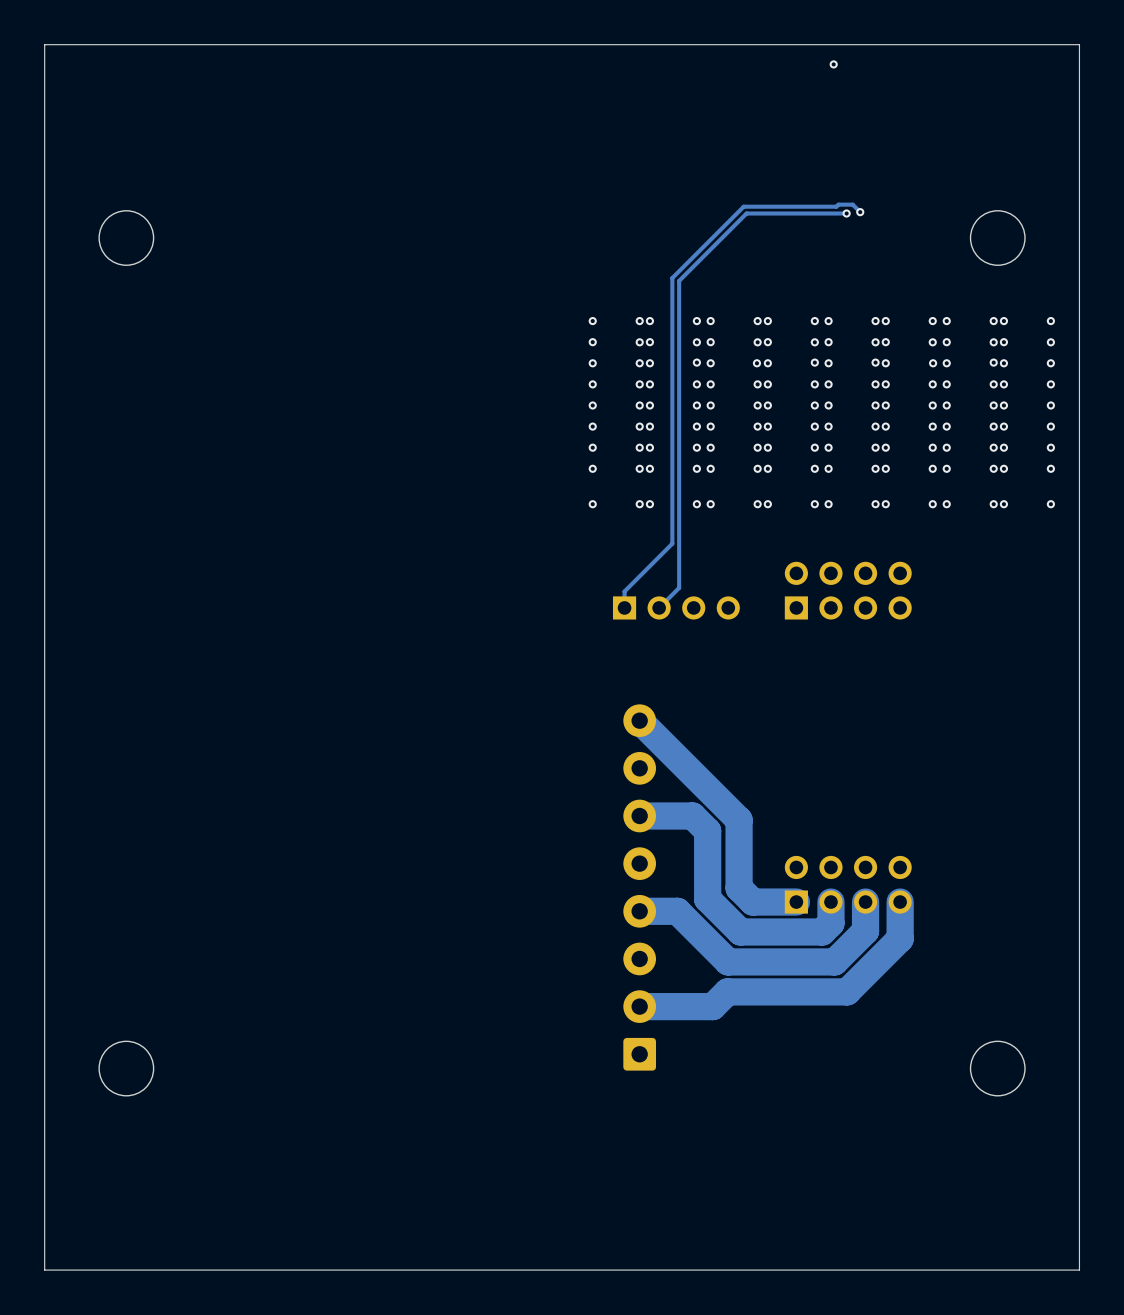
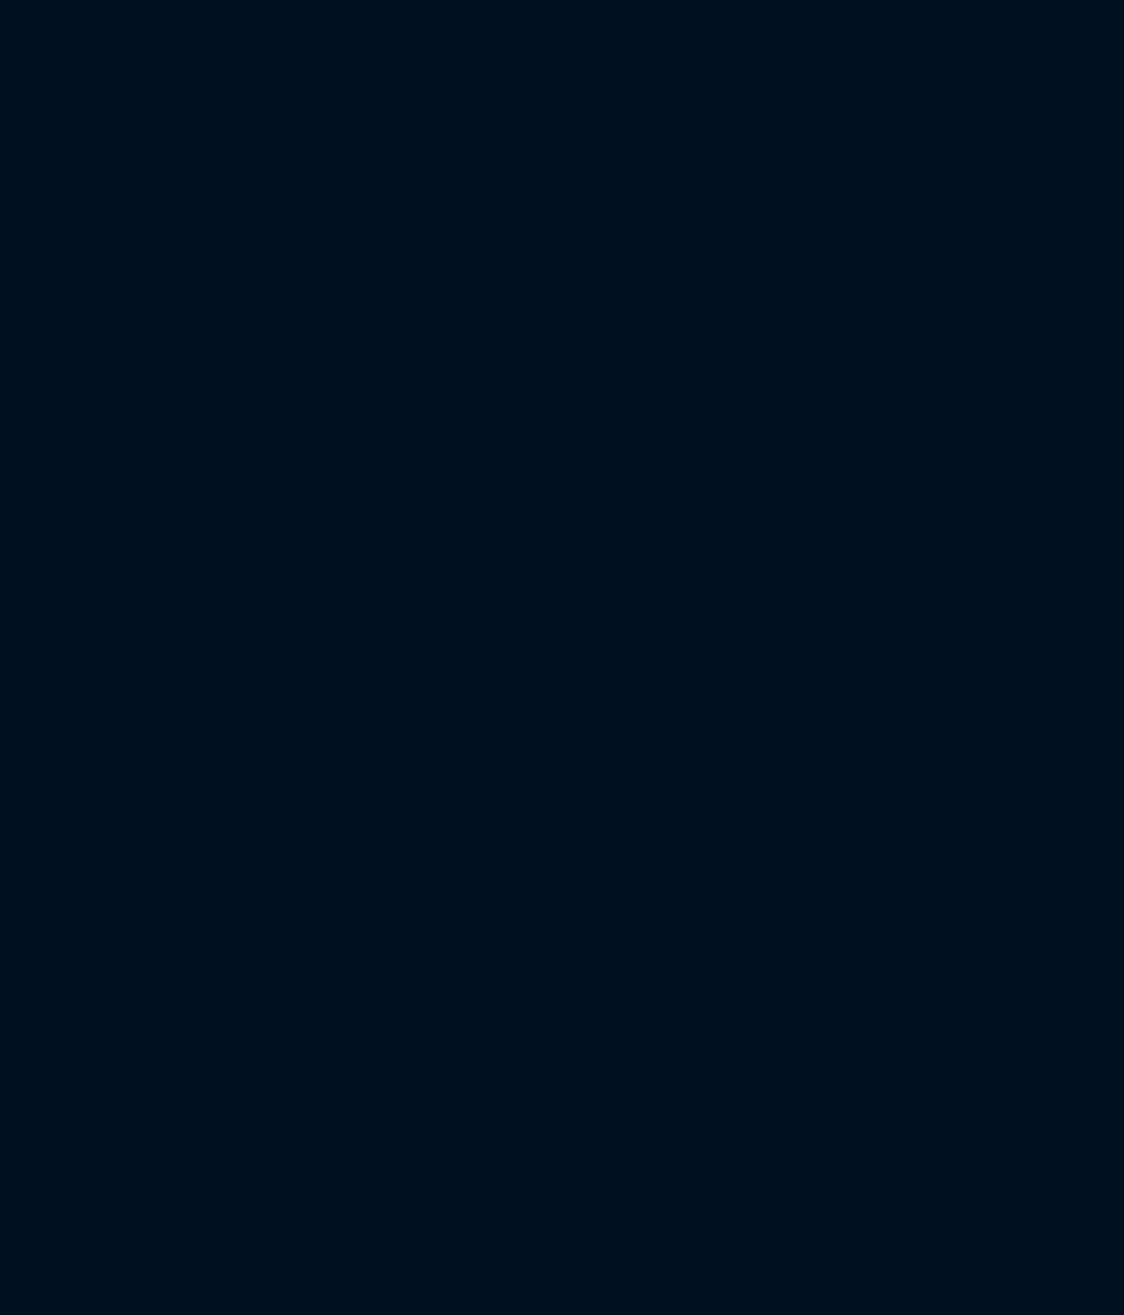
board edge: (1079, 44) (44, 44) (44, 1270) (1079, 1270) (1079, 44) -> none
via: (833, 64) -> none
round board edge: [98, 210, 155, 266] -> none
round board edge: [969, 210, 1026, 266] -> none
track: (860, 212) (852, 204) (838, 204) (836, 206) (743, 206) (672, 278) (672, 543) (624, 591) (624, 607) -> none
via: (860, 212) -> none
track: (846, 213) (746, 213) (679, 280) (679, 587) (659, 607) -> none
via: (846, 213) -> none
via: (592, 321) -> none
via: (639, 321) -> none
via: (649, 321) -> none
via: (696, 321) -> none
via: (710, 321) -> none
via: (757, 321) -> none
via: (767, 321) -> none
via: (814, 321) -> none
via: (828, 321) -> none
via: (875, 321) -> none
via: (885, 321) -> none
via: (932, 321) -> none
via: (946, 321) -> none
via: (993, 321) -> none
via: (1003, 321) -> none
via: (1050, 321) -> none
via: (592, 342) -> none
via: (639, 342) -> none
via: (649, 342) -> none
via: (696, 342) -> none
via: (710, 342) -> none
via: (757, 342) -> none
via: (767, 342) -> none
via: (814, 342) -> none
via: (828, 342) -> none
via: (875, 342) -> none
via: (885, 342) -> none
via: (932, 342) -> none
via: (946, 342) -> none
via: (993, 342) -> none
via: (1003, 342) -> none
via: (1050, 342) -> none
via: (696, 362) -> none
via: (814, 362) -> none
via: (875, 362) -> none
via: (993, 362) -> none
via: (592, 363) -> none
via: (639, 363) -> none
via: (649, 363) -> none
via: (710, 363) -> none
via: (756, 363) -> none
via: (767, 363) -> none
via: (828, 363) -> none
via: (885, 363) -> none
via: (933, 363) -> none
via: (946, 363) -> none
via: (1003, 363) -> none
via: (1050, 363) -> none
via: (592, 384) -> none
via: (639, 384) -> none
via: (649, 384) -> none
via: (696, 384) -> none
via: (710, 384) -> none
via: (757, 384) -> none
via: (767, 384) -> none
via: (814, 384) -> none
via: (828, 384) -> none
via: (875, 384) -> none
via: (885, 384) -> none
via: (932, 384) -> none
via: (946, 384) -> none
via: (993, 384) -> none
via: (1003, 384) -> none
via: (1050, 384) -> none
via: (592, 405) -> none
via: (639, 405) -> none
via: (649, 405) -> none
via: (696, 405) -> none
via: (710, 405) -> none
via: (757, 405) -> none
via: (767, 405) -> none
via: (814, 405) -> none
via: (828, 405) -> none
via: (875, 405) -> none
via: (885, 405) -> none
via: (932, 405) -> none
via: (946, 405) -> none
via: (993, 405) -> none
via: (1003, 405) -> none
via: (1050, 405) -> none
via: (592, 426) -> none
via: (639, 426) -> none
via: (649, 426) -> none
via: (696, 426) -> none
via: (710, 426) -> none
via: (757, 426) -> none
via: (767, 426) -> none
via: (814, 426) -> none
via: (828, 426) -> none
via: (875, 426) -> none
via: (885, 426) -> none
via: (932, 426) -> none
via: (946, 426) -> none
via: (993, 426) -> none
via: (1003, 426) -> none
via: (1050, 426) -> none
via: (592, 447) -> none
via: (639, 447) -> none
via: (649, 447) -> none
via: (696, 447) -> none
via: (710, 447) -> none
via: (757, 447) -> none
via: (767, 447) -> none
via: (814, 447) -> none
via: (828, 447) -> none
via: (875, 447) -> none
via: (885, 447) -> none
via: (932, 447) -> none
via: (946, 447) -> none
via: (993, 447) -> none
via: (1003, 447) -> none
via: (1050, 447) -> none
via: (592, 468) -> none
via: (639, 468) -> none
via: (649, 468) -> none
via: (696, 468) -> none
via: (710, 468) -> none
via: (757, 468) -> none
via: (767, 468) -> none
via: (814, 468) -> none
via: (828, 468) -> none
via: (875, 468) -> none
via: (885, 468) -> none
via: (932, 468) -> none
via: (946, 468) -> none
via: (993, 468) -> none
via: (1003, 468) -> none
via: (1050, 468) -> none
via: (592, 504) -> none
via: (639, 504) -> none
via: (649, 504) -> none
via: (696, 504) -> none
via: (710, 504) -> none
via: (757, 504) -> none
via: (767, 504) -> none
via: (814, 504) -> none
via: (828, 504) -> none
via: (875, 504) -> none
via: (885, 504) -> none
via: (932, 504) -> none
via: (946, 504) -> none
via: (993, 504) -> none
via: (1003, 504) -> none
via: (1050, 504) -> none
part: (848, 590) -> none
part: (676, 607) -> none
track: (639, 720) (739, 820) (739, 888) (752, 902) (796, 902) -> none
track: (639, 815) (692, 815) (707, 831) (707, 899) (740, 932) (822, 932) (830, 923) (830, 902) -> none
part: (848, 884) -> none
part: (639, 887) -> none
track: (865, 902) (865, 931) (834, 961) (728, 961) (677, 911) (639, 911) -> none
track: (900, 902) (900, 938) (847, 991) (727, 991) (712, 1006) (639, 1006) -> none
round board edge: [98, 1040, 155, 1097] -> none
round board edge: [969, 1040, 1026, 1097] -> none

